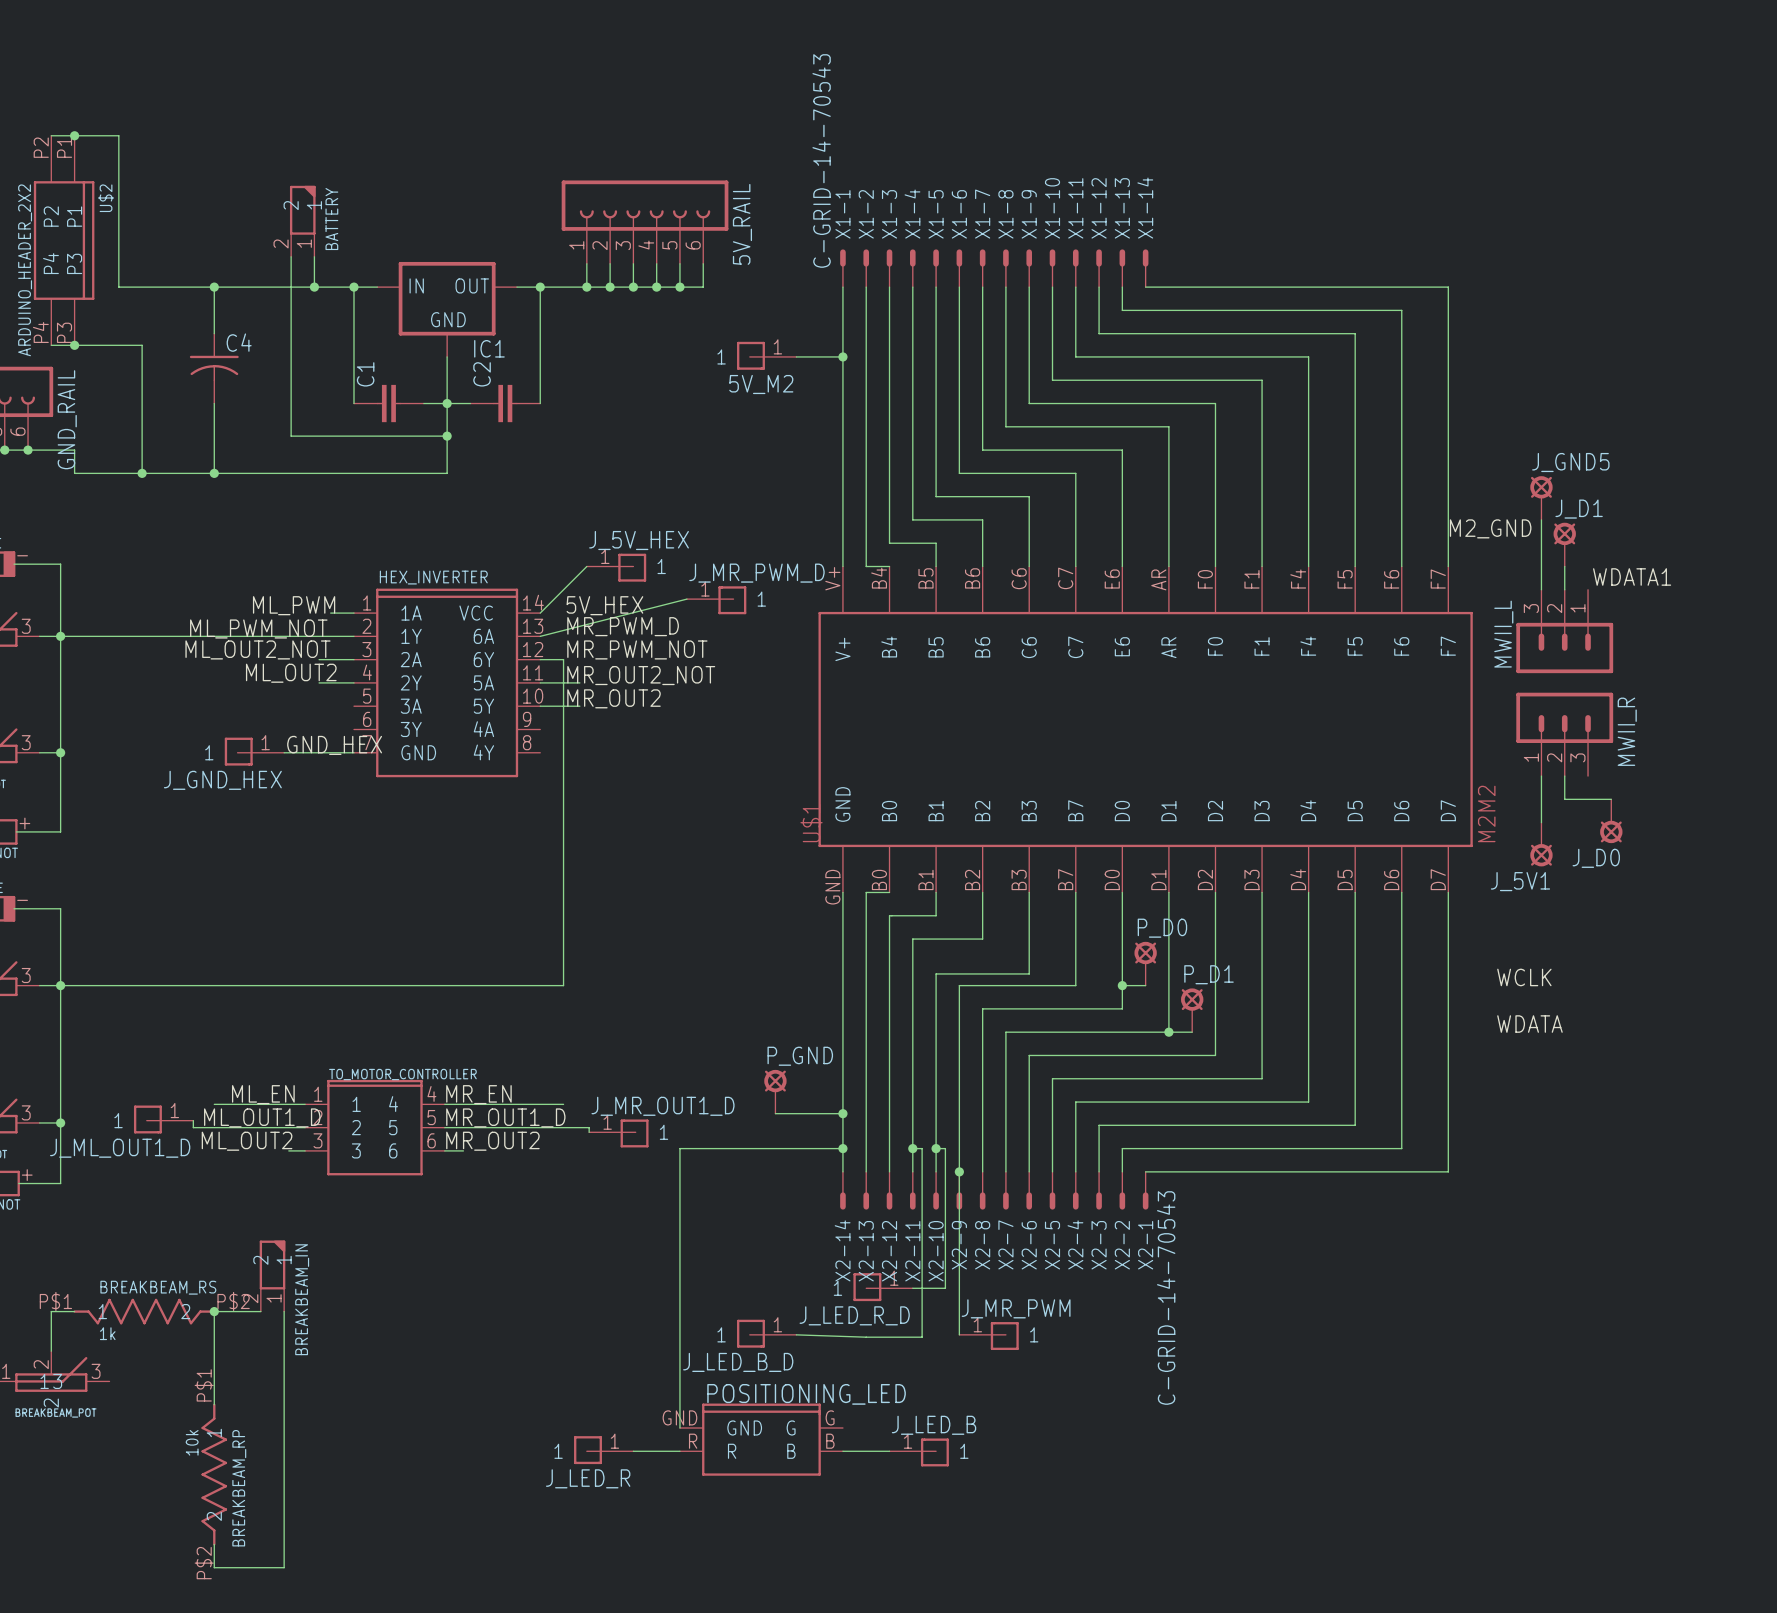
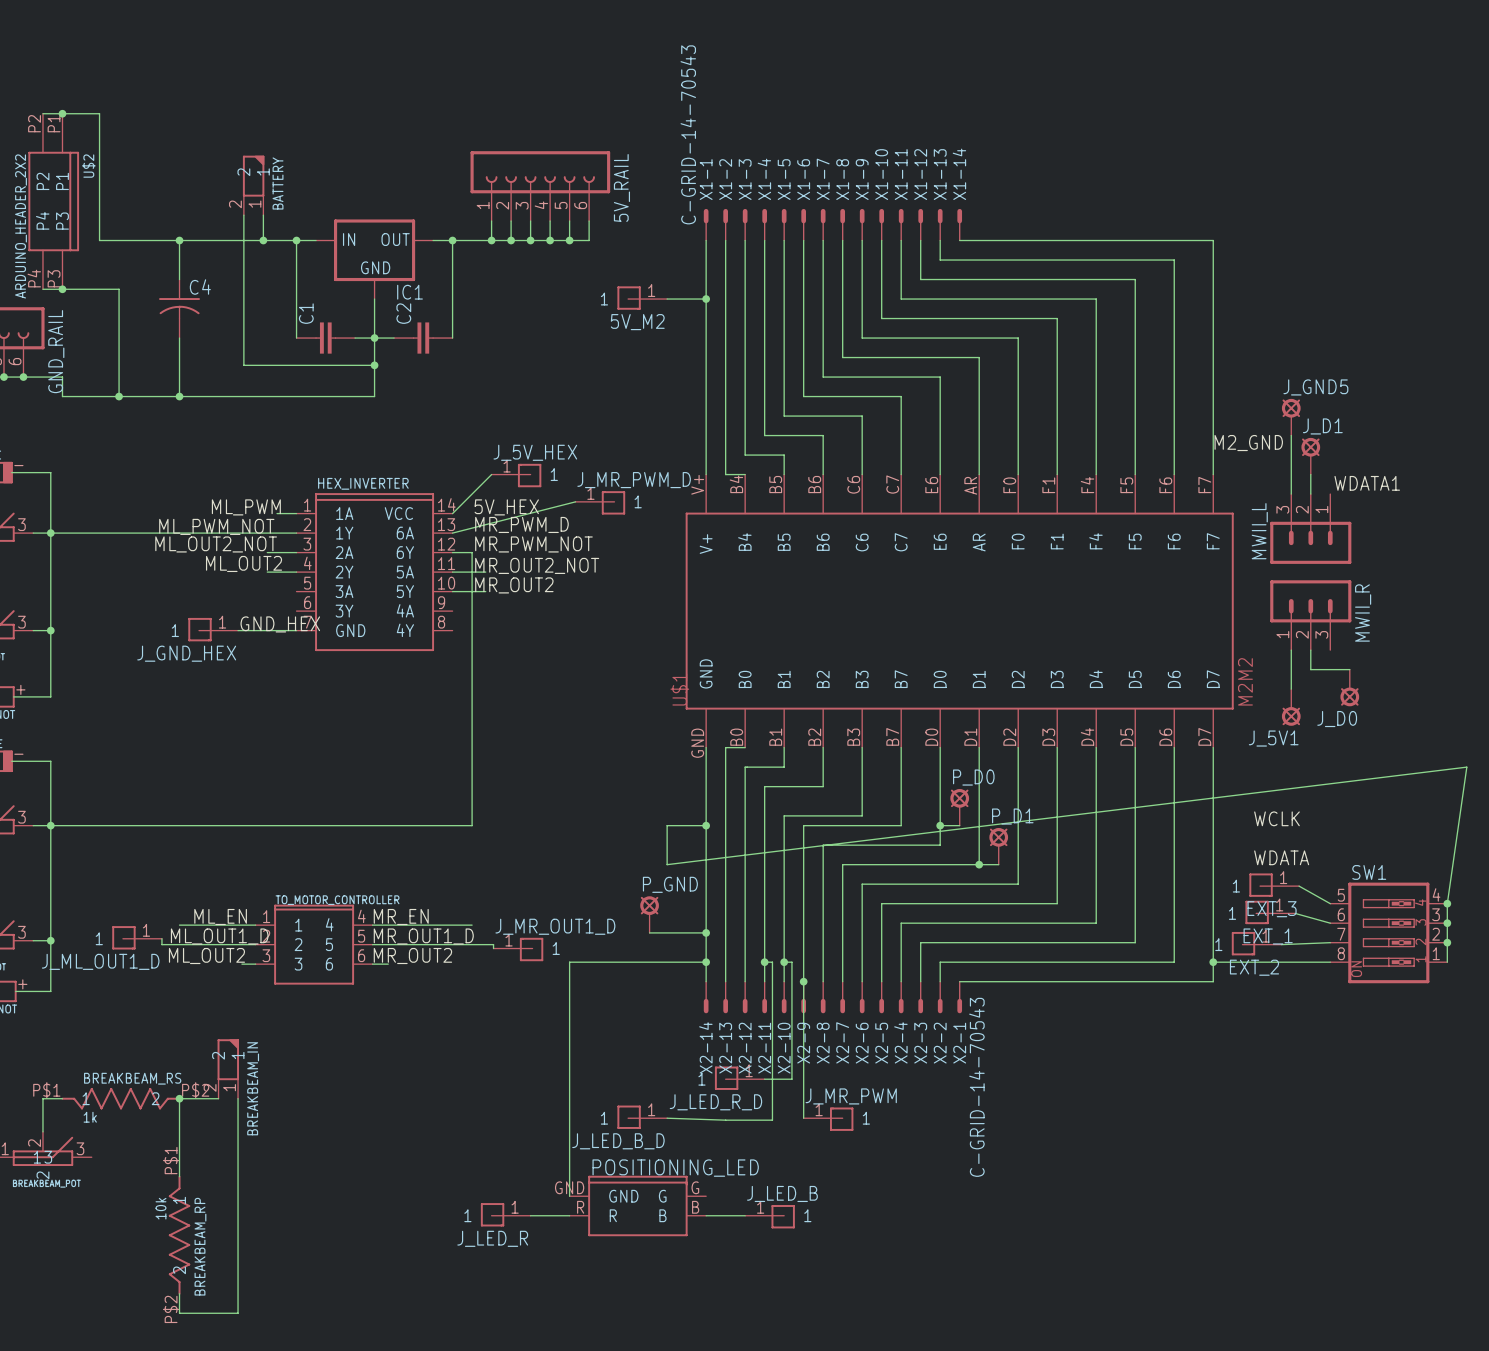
wire: none -> (706, 825) (667, 825) (667, 864) (1466, 767) (1447, 903) (1447, 962)
junction: none -> (706, 825)
EXT_3: none -> (1274, 885)
wire: none -> (1299, 886) (1330, 903)
junction: none -> (1447, 903)
EXT_1: none -> (1270, 912)
wire: none -> (1295, 913) (1330, 923)
junction: none -> (1447, 923)
SW1: none -> (1388, 932)
wire: none -> (1330, 942) (1281, 944)
junction: none -> (1447, 942)
EXT_2: none -> (1256, 943)
wire: none -> (1213, 962) (1330, 962)
junction: none -> (1213, 962)

